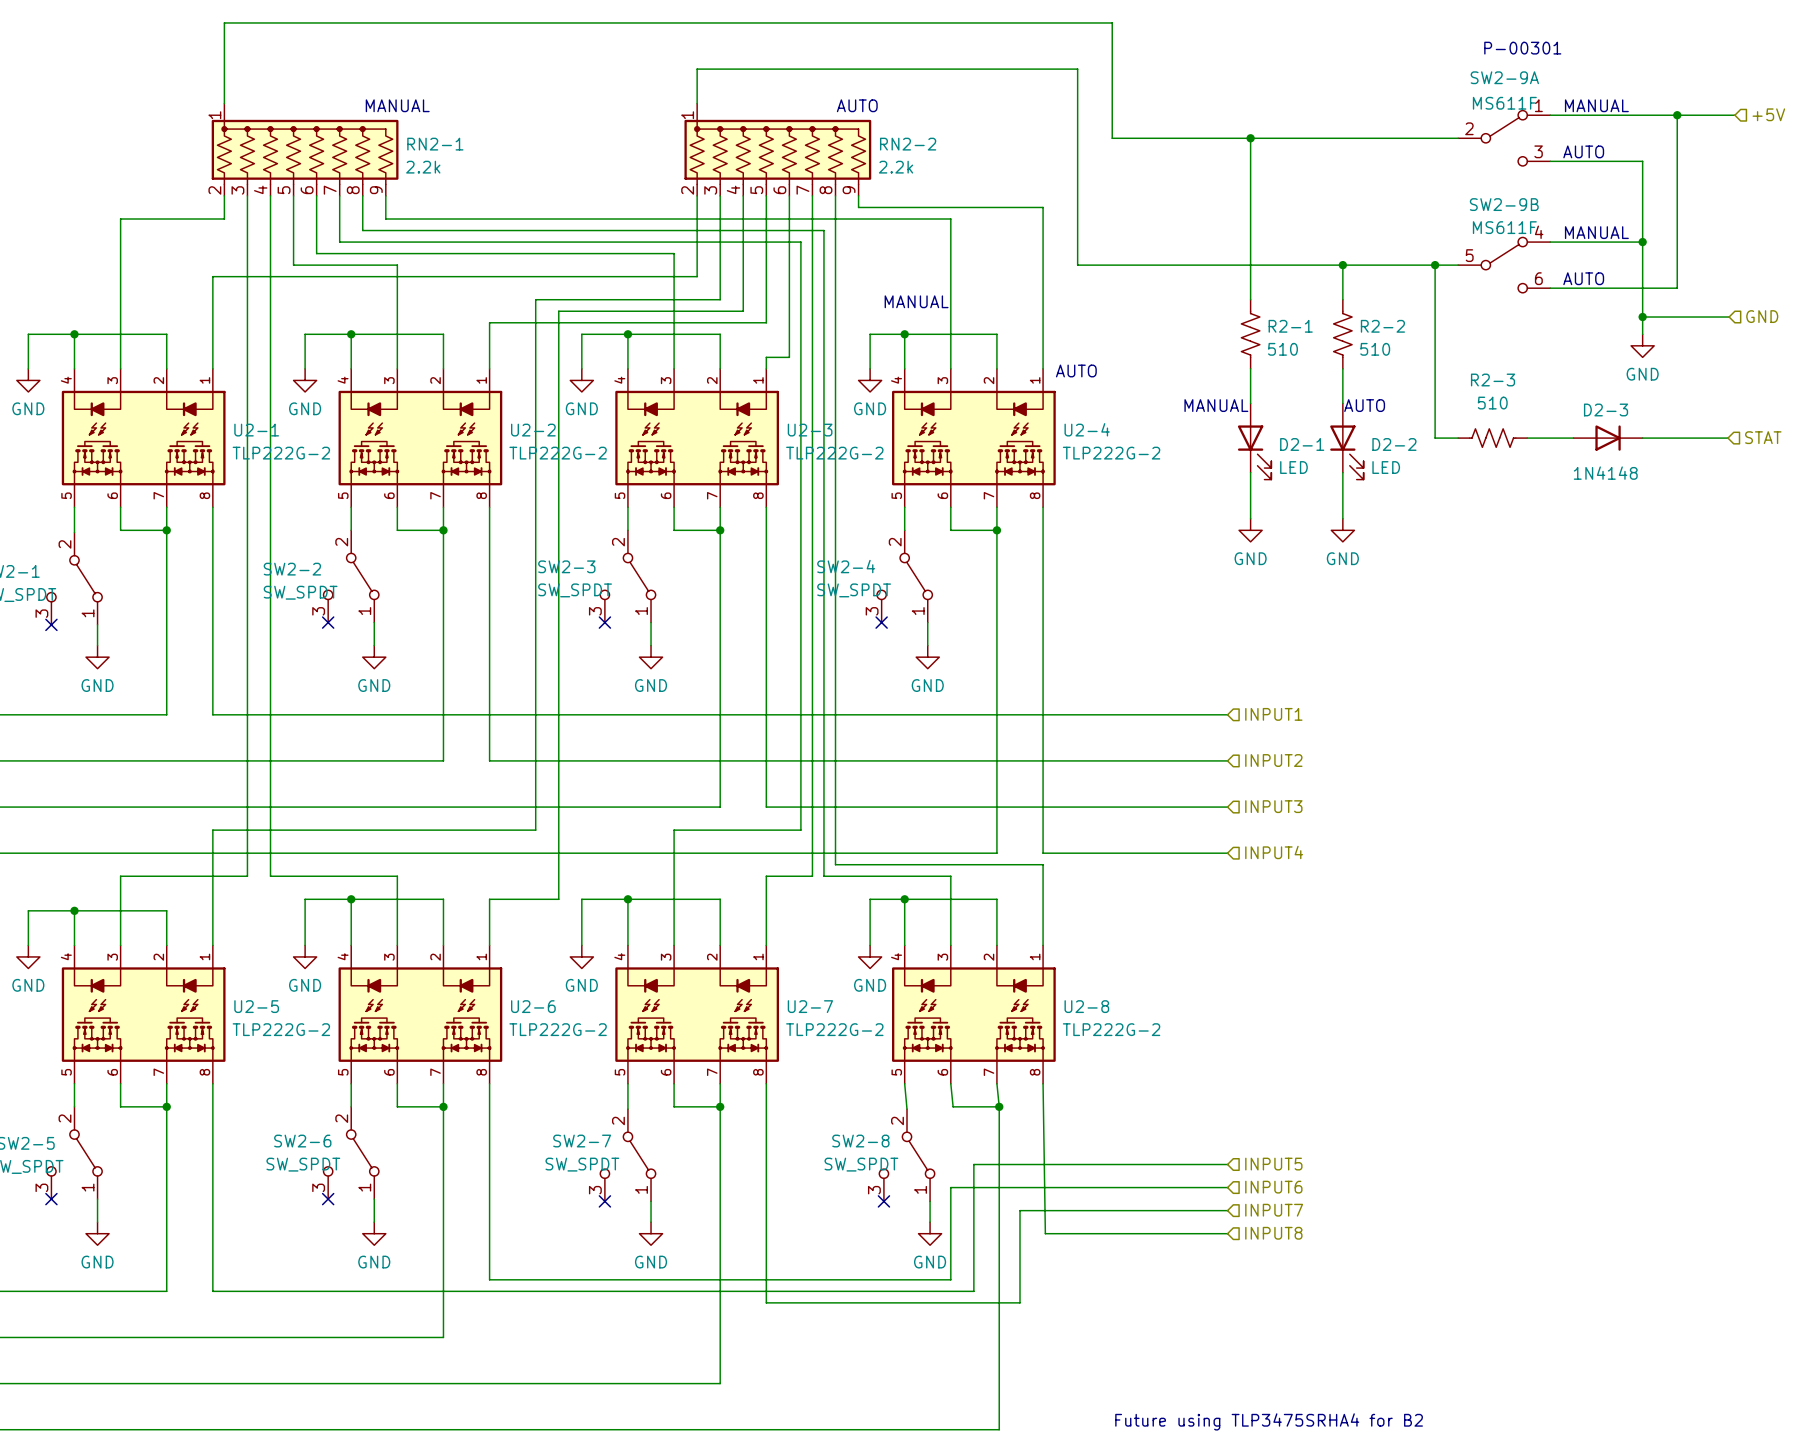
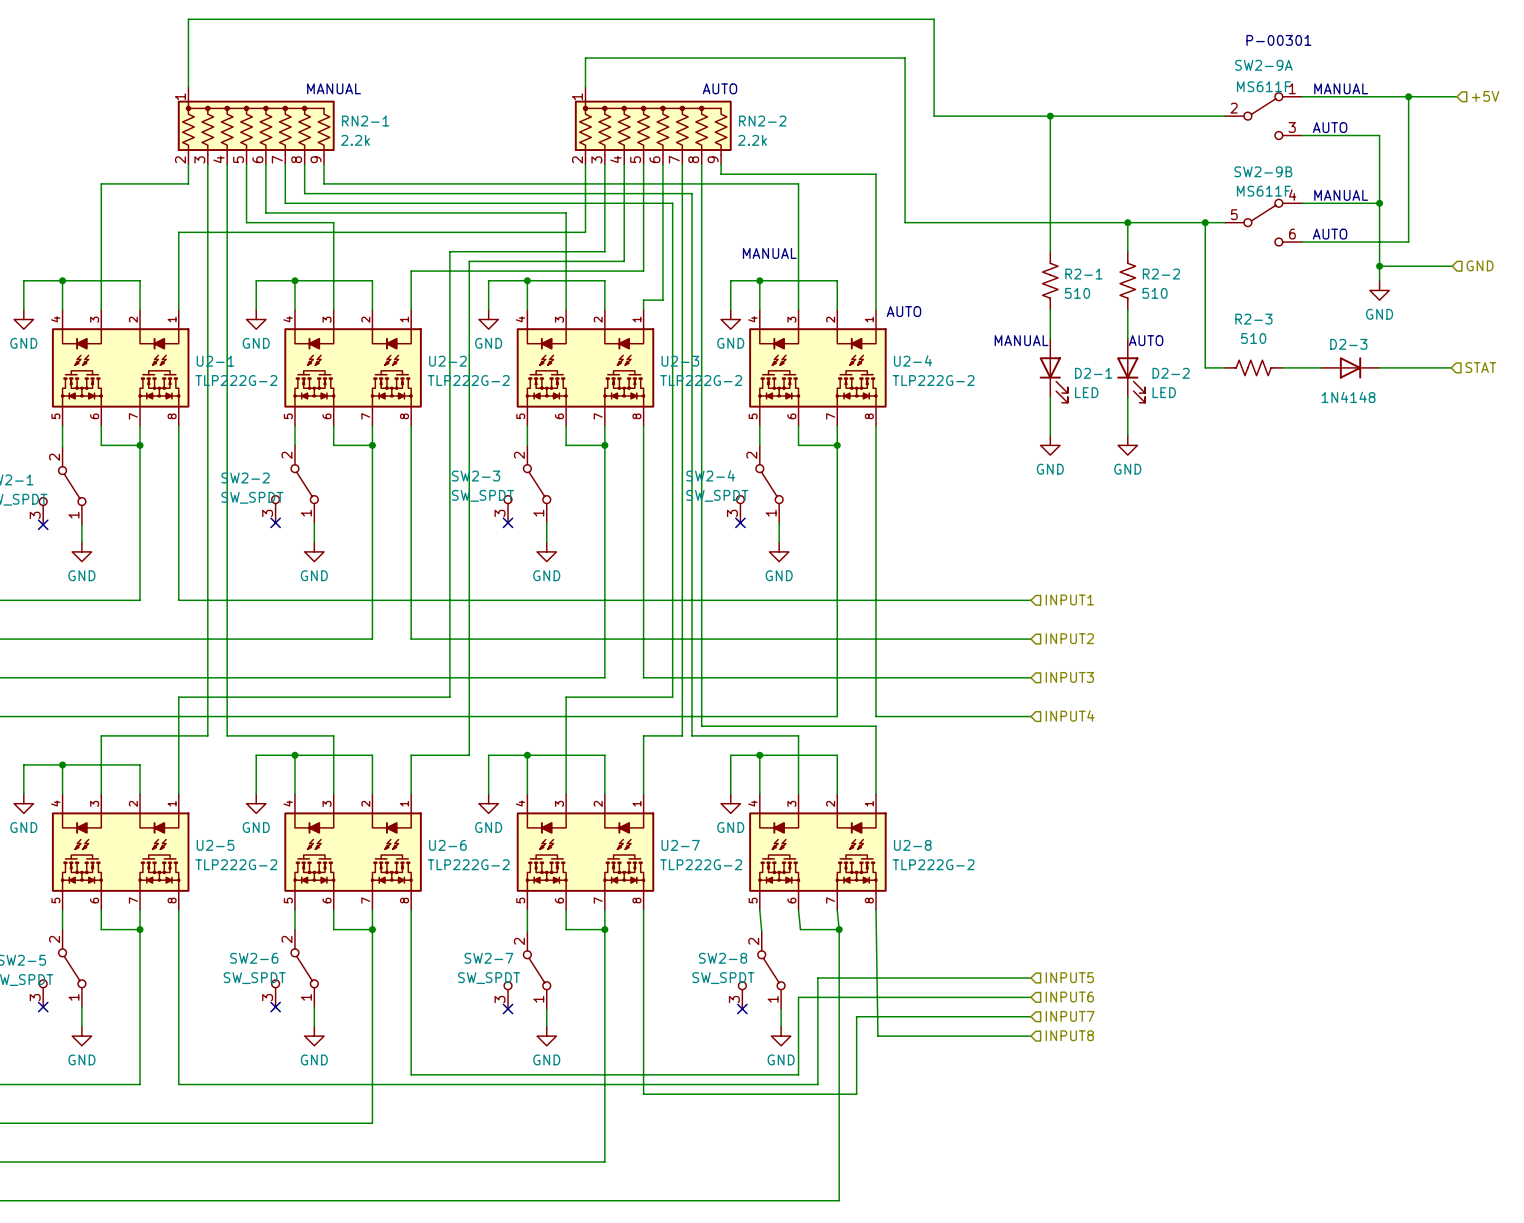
text: Future using TLP3475SRHA4 for B2 (1269, 1421) -> none

